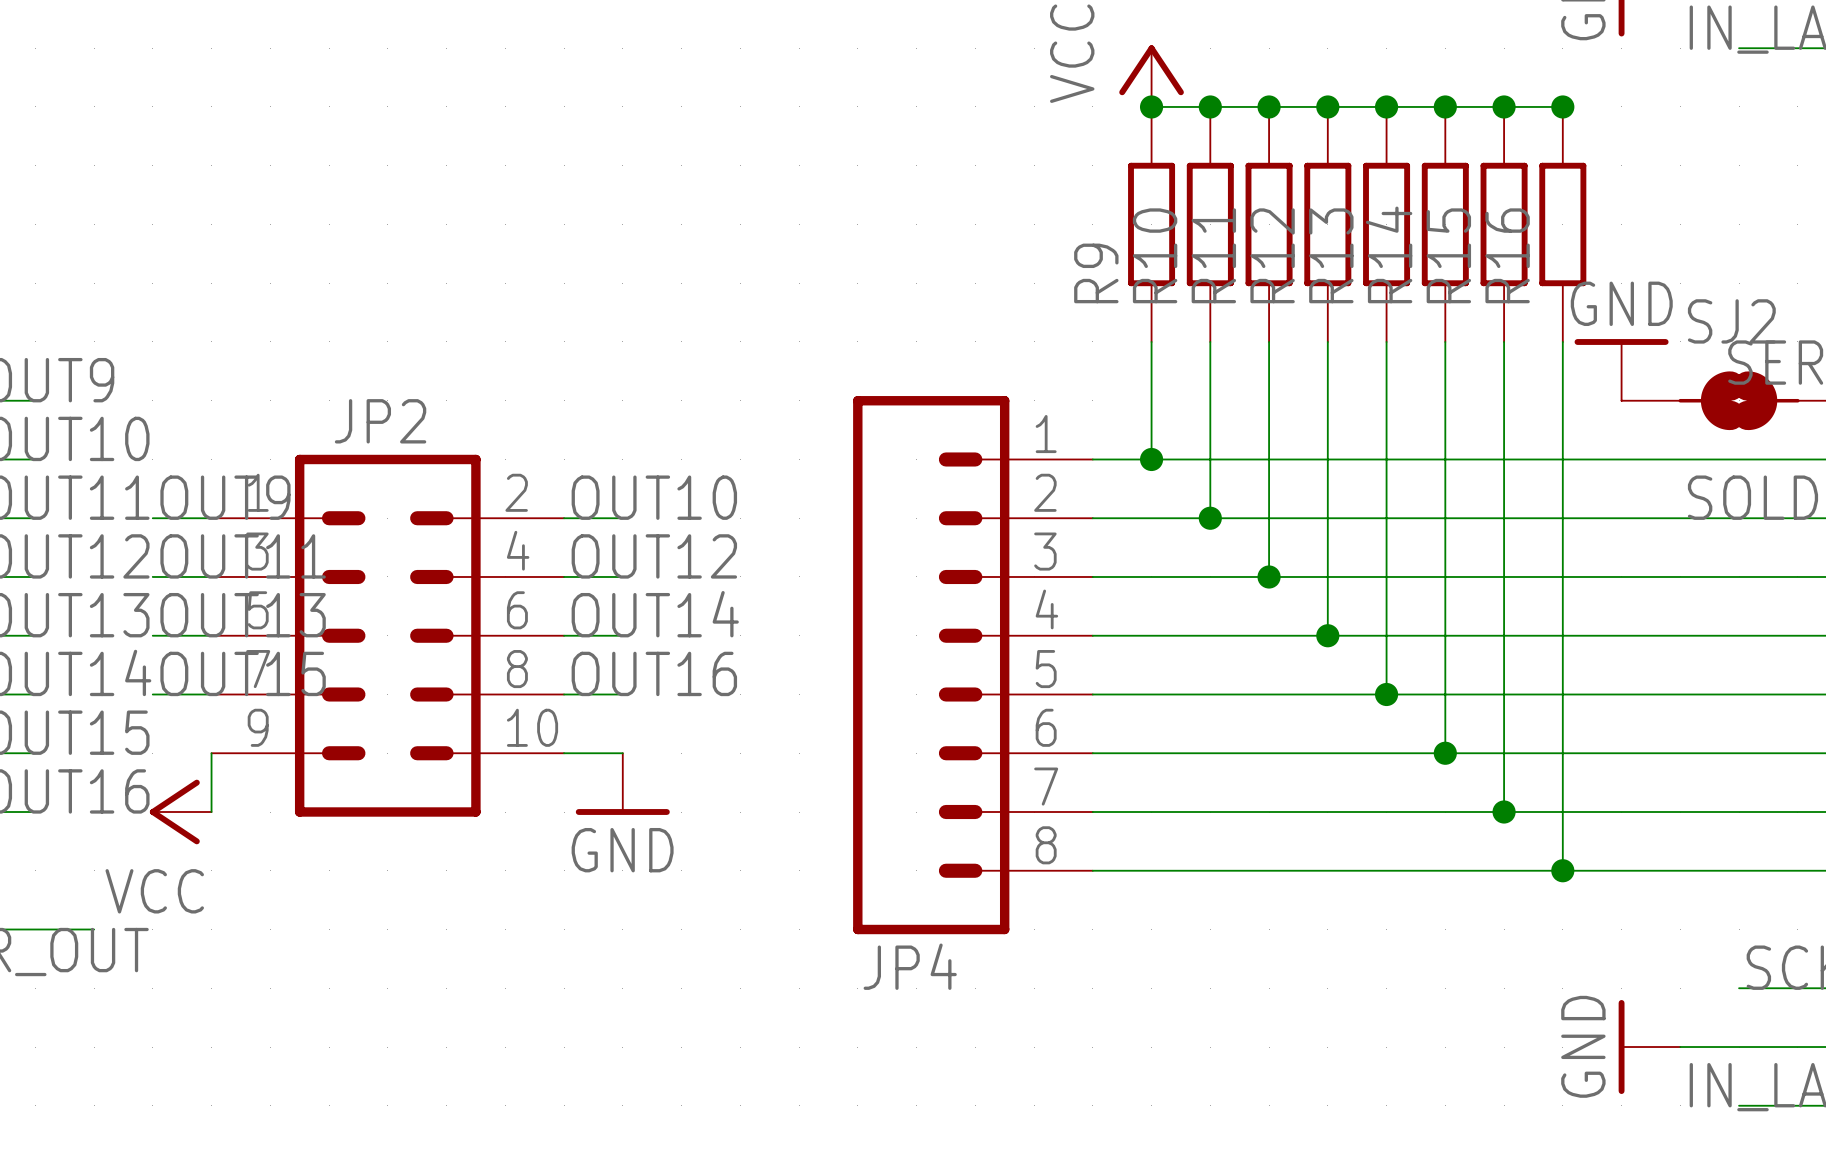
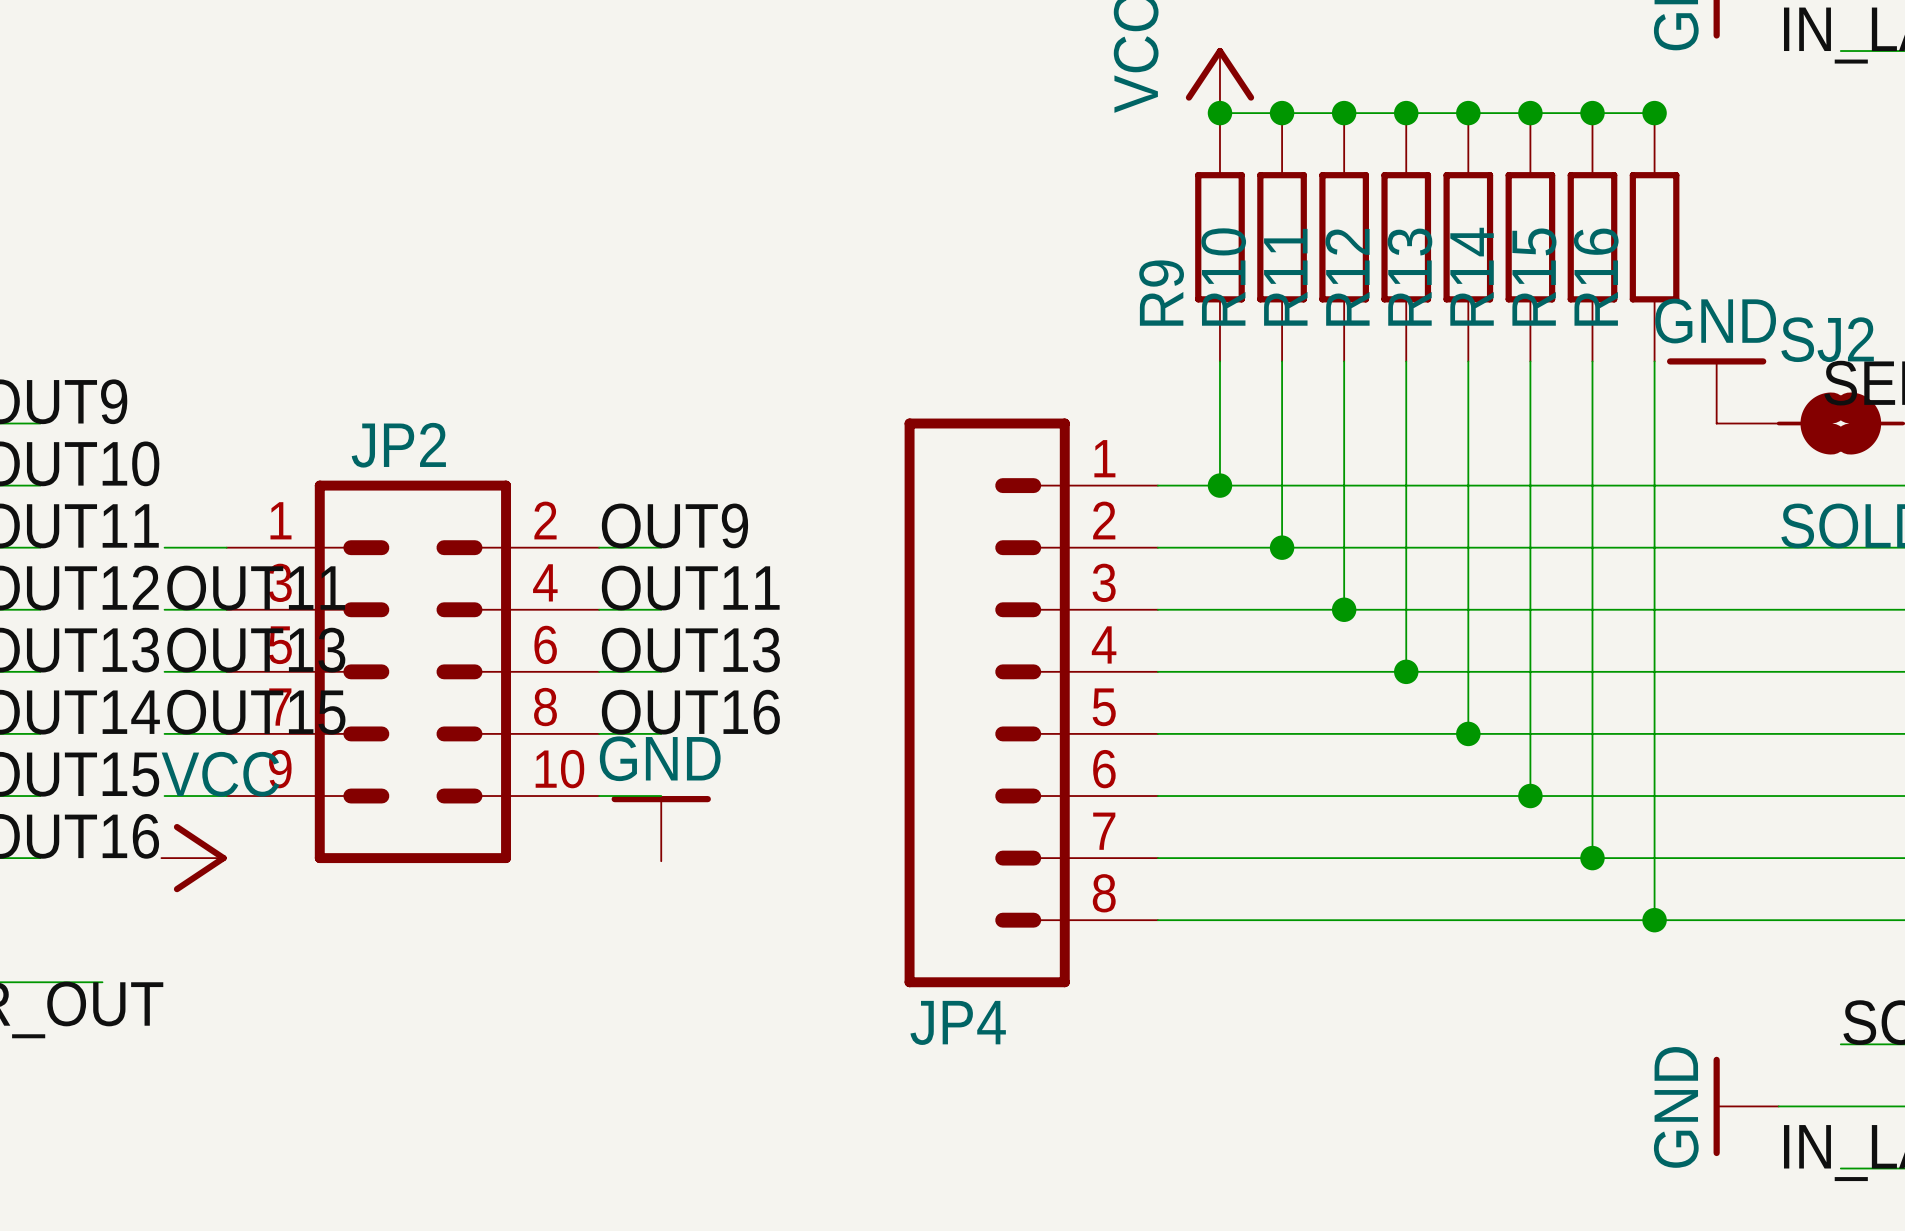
label: OUT9 (225, 497) -> none
label: OUT10 (654, 497) -> OUT9 (674, 525)
label: OUT12 (654, 556) -> OUT11 (690, 588)
label: OUT14 (655, 614) -> OUT13 (690, 650)
wire: (211, 753) (211, 812) -> (226, 796) (164, 796)
power symbol rotation: 0° (174, 812) -> 180° (200, 858)
power symbol rotation: 0° (622, 812) -> 180° (661, 799)

